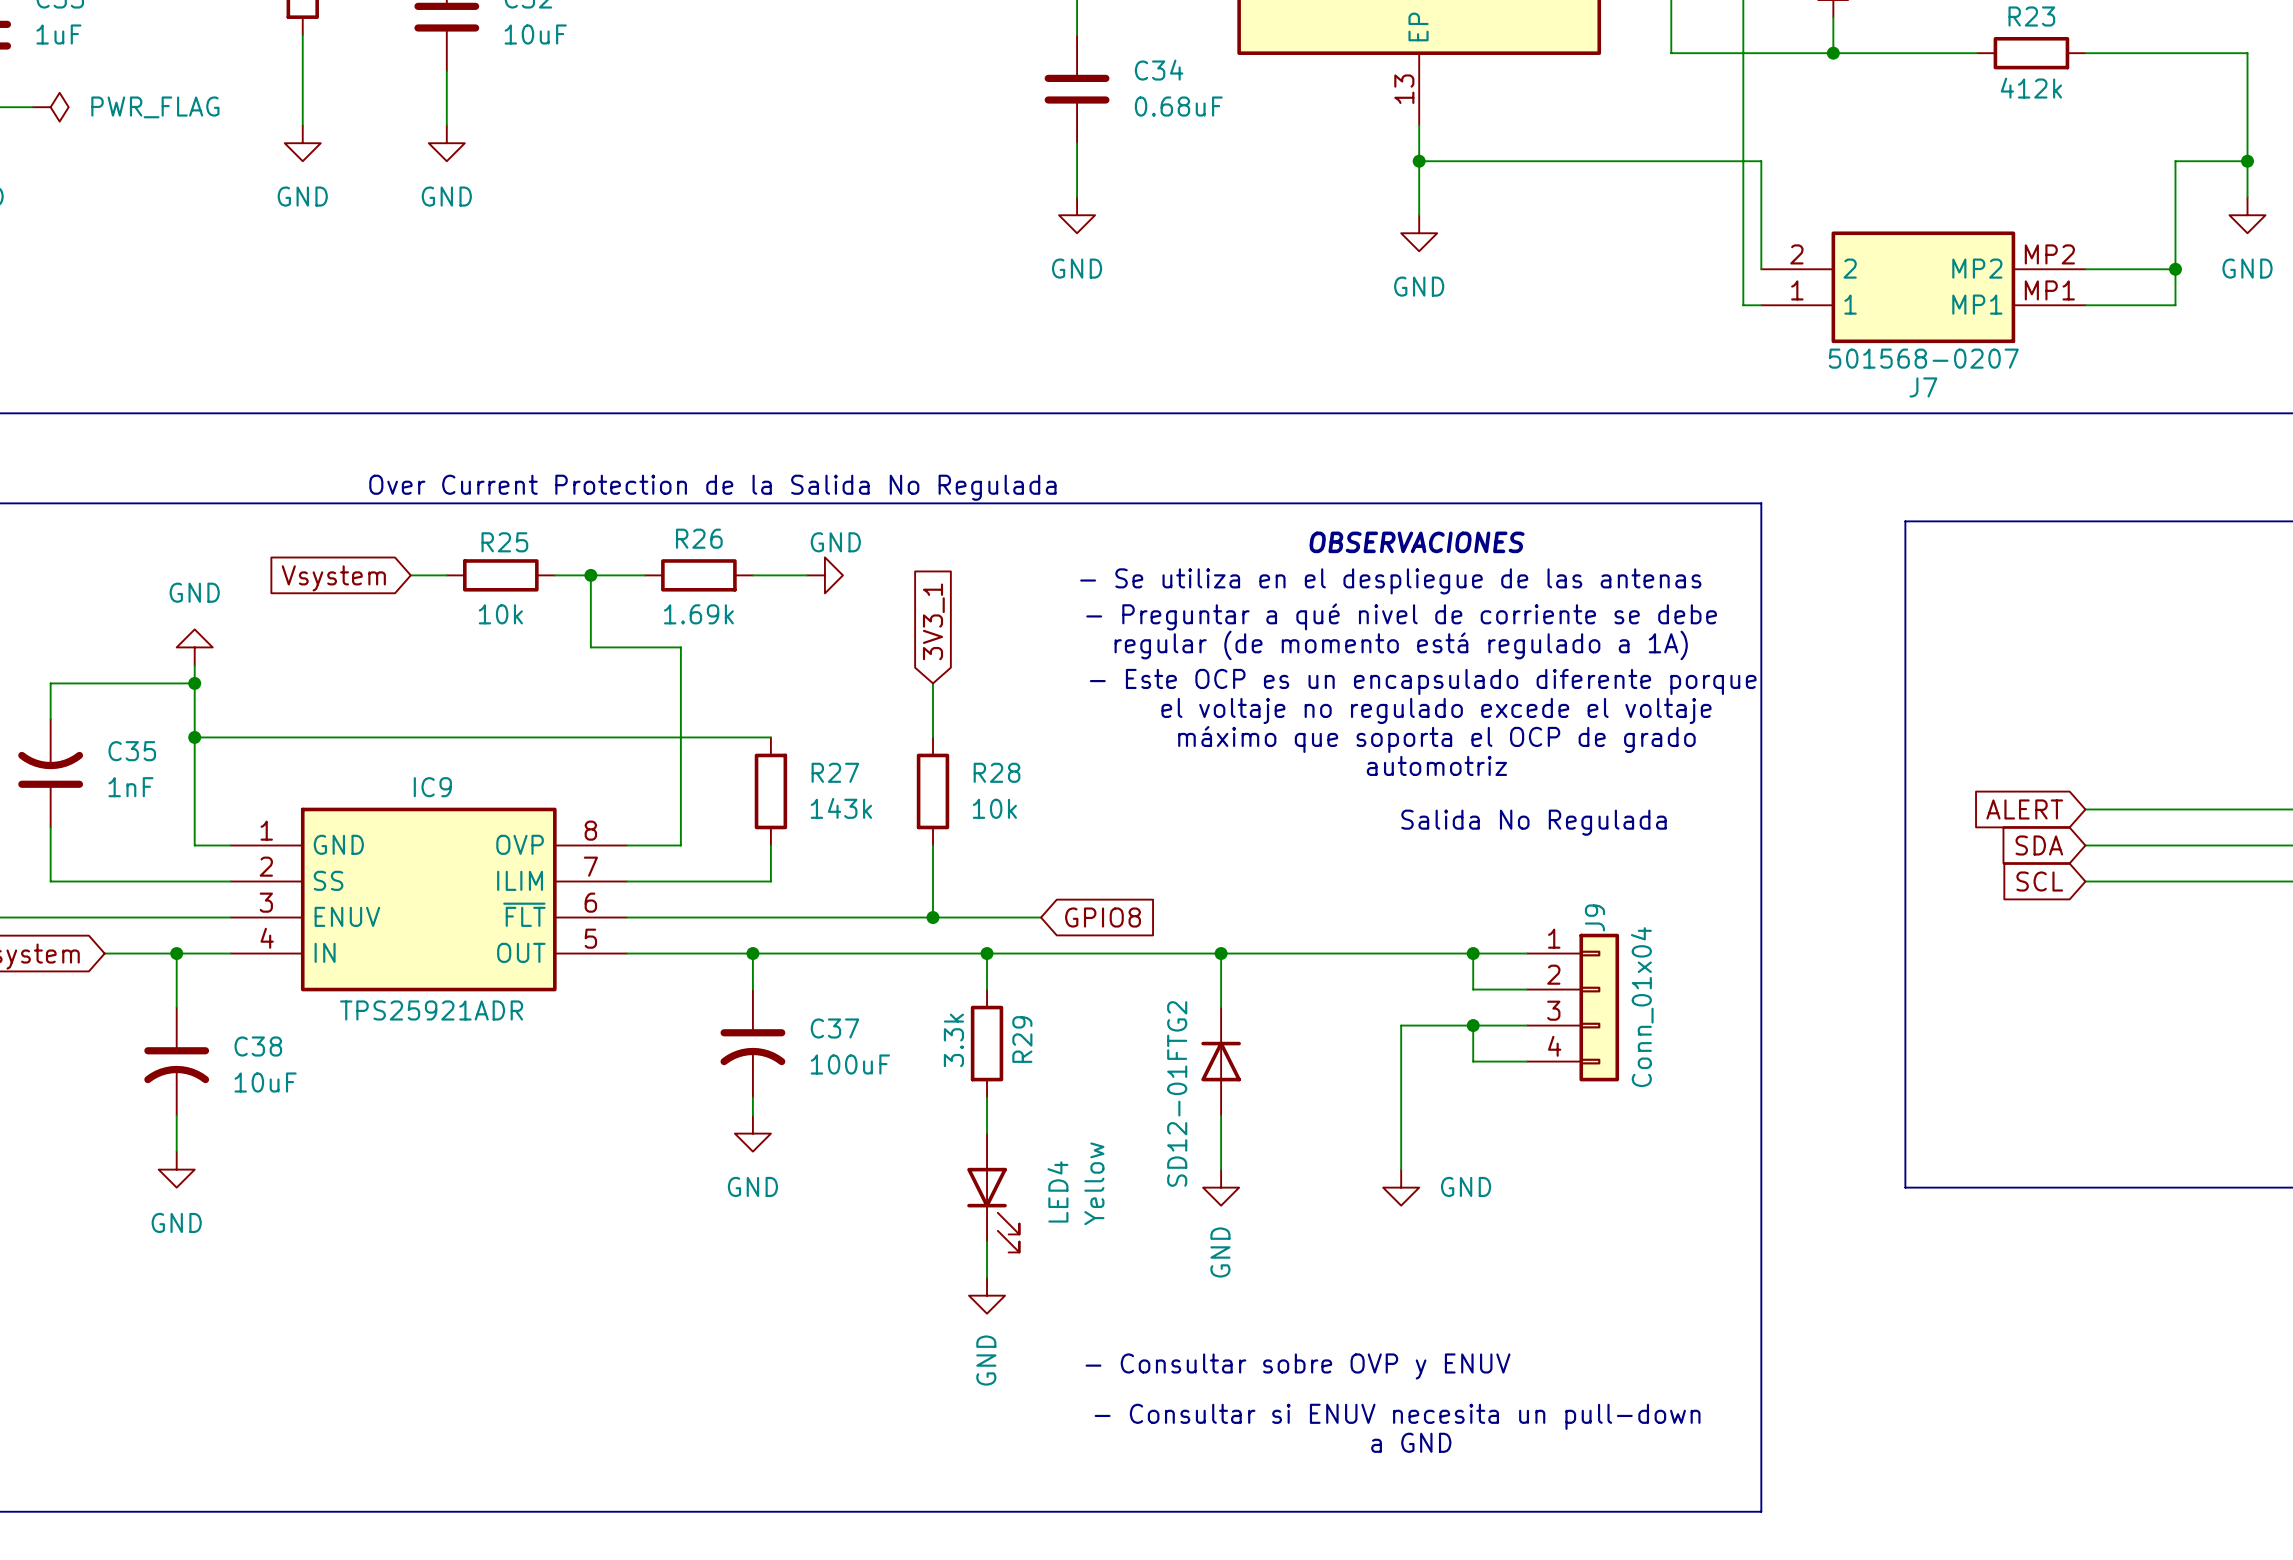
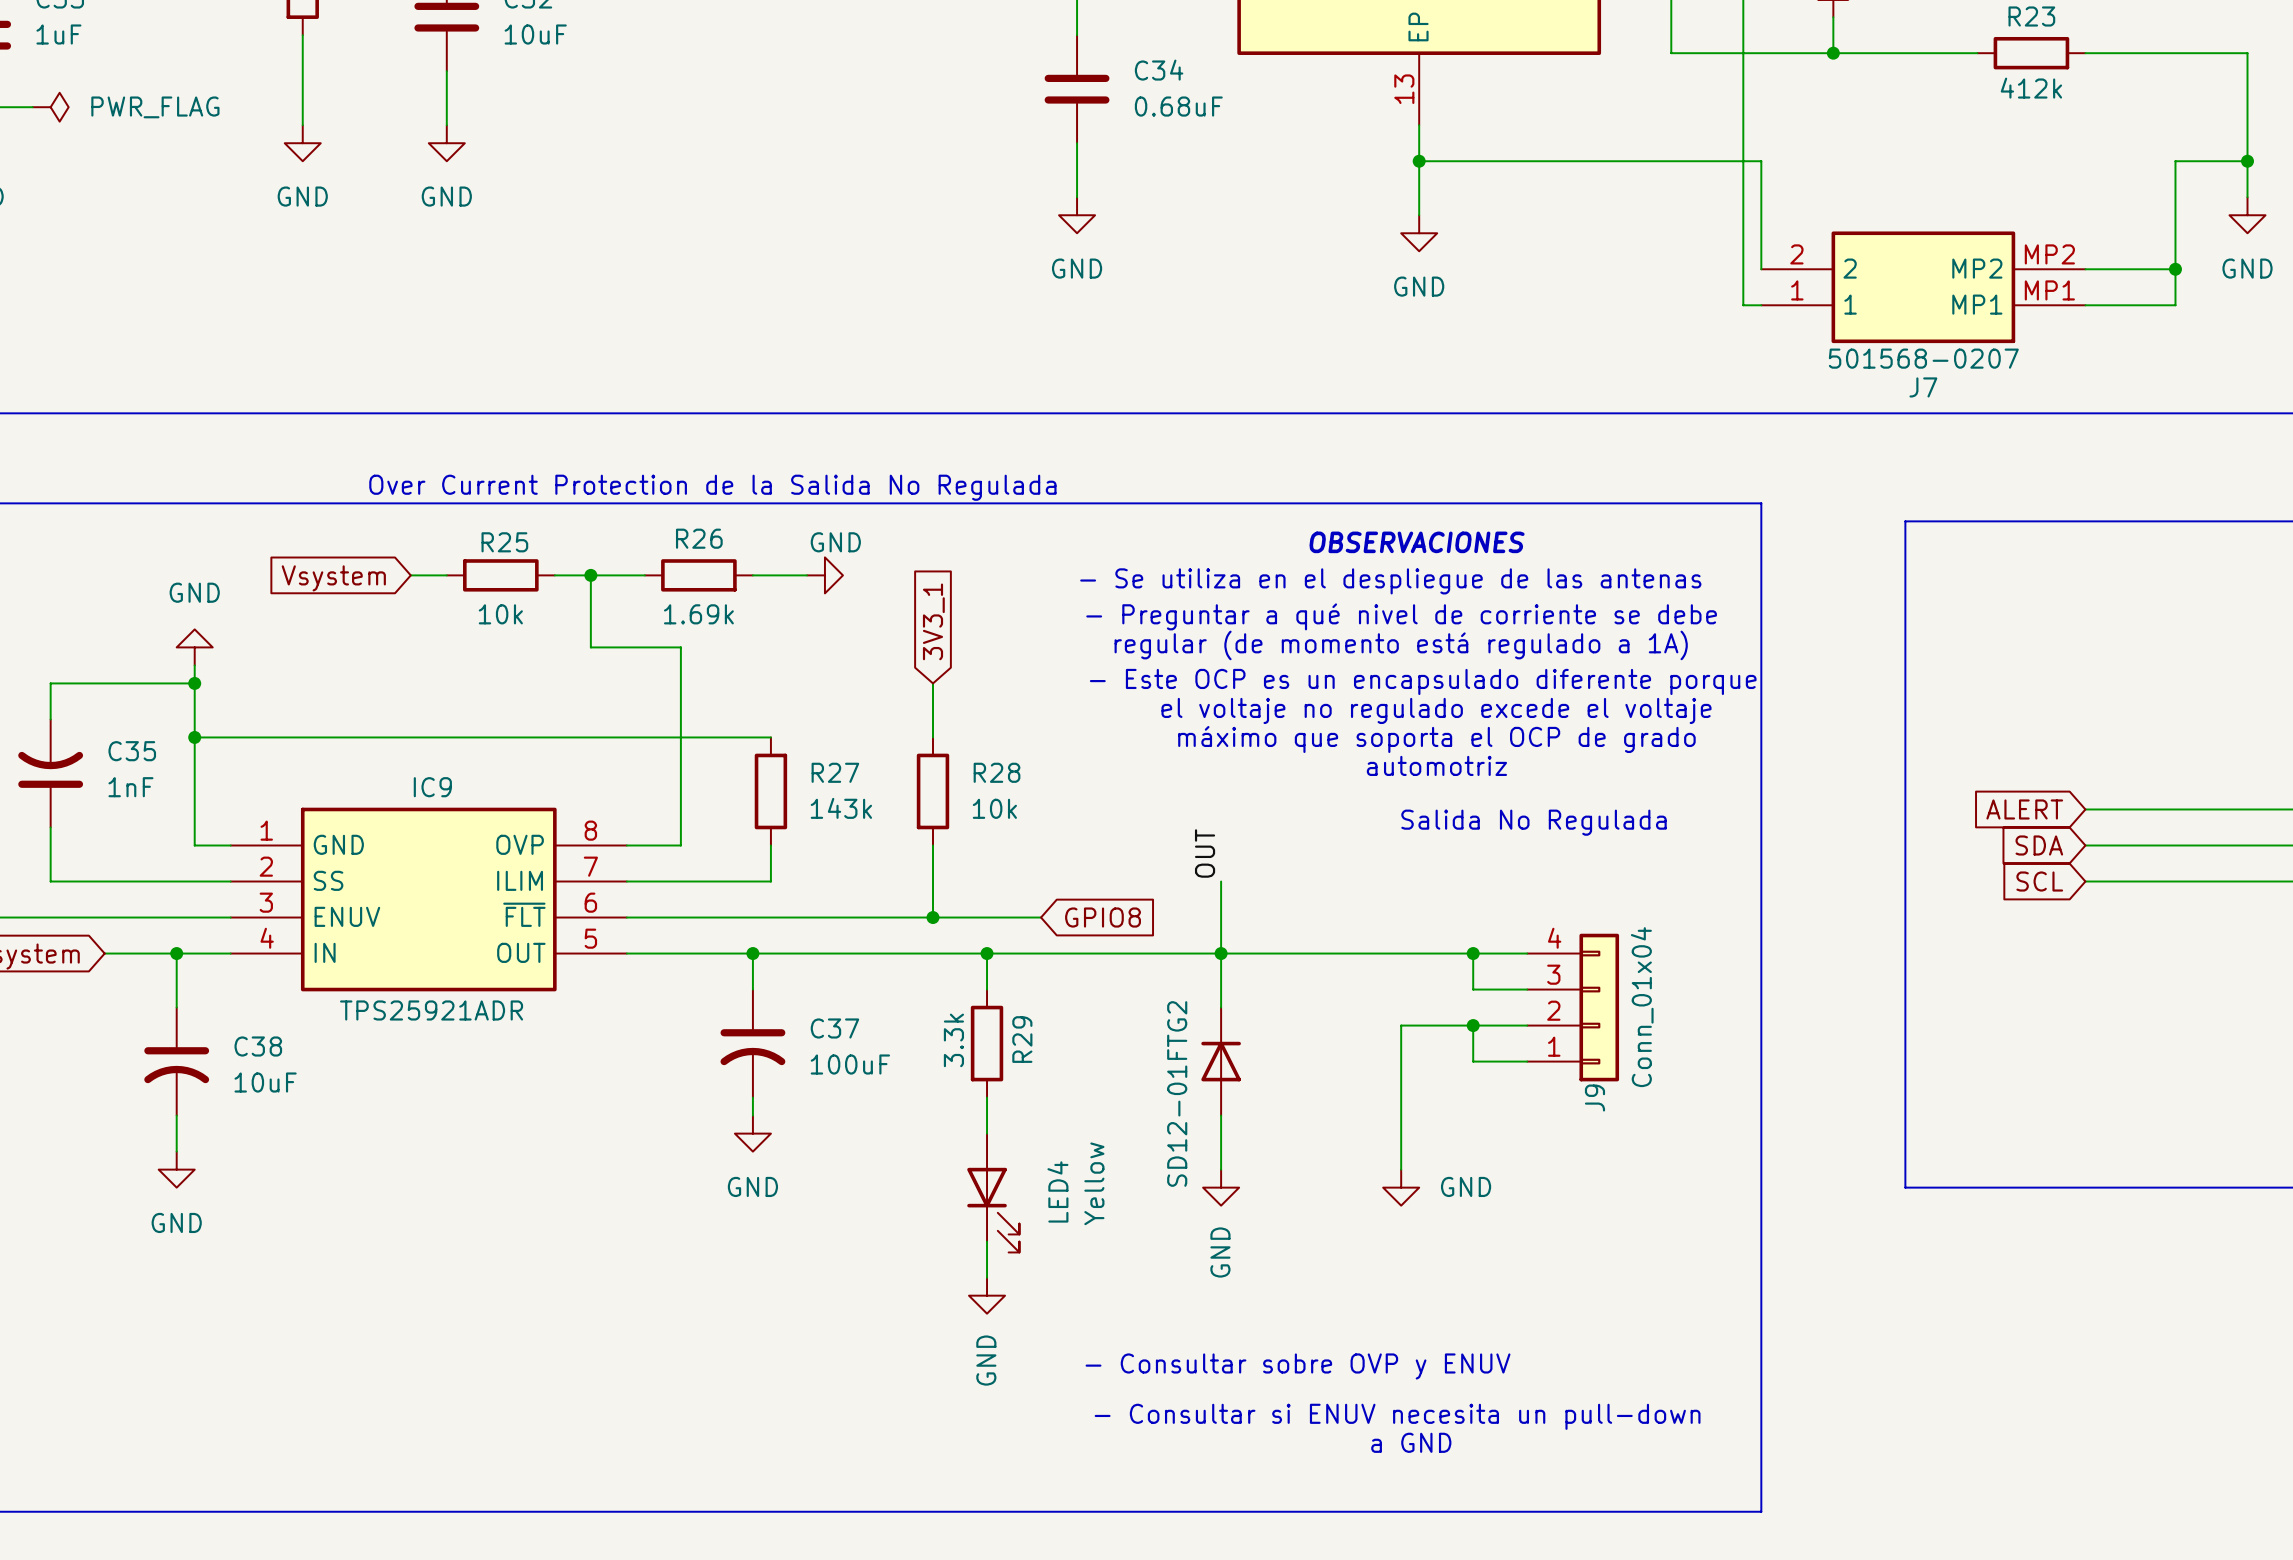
label: none -> OUT (1205, 853)
wire: none -> (1221, 881) (1221, 953)
J9 flip: as is (1599, 1007) -> up-down (1599, 1007)

